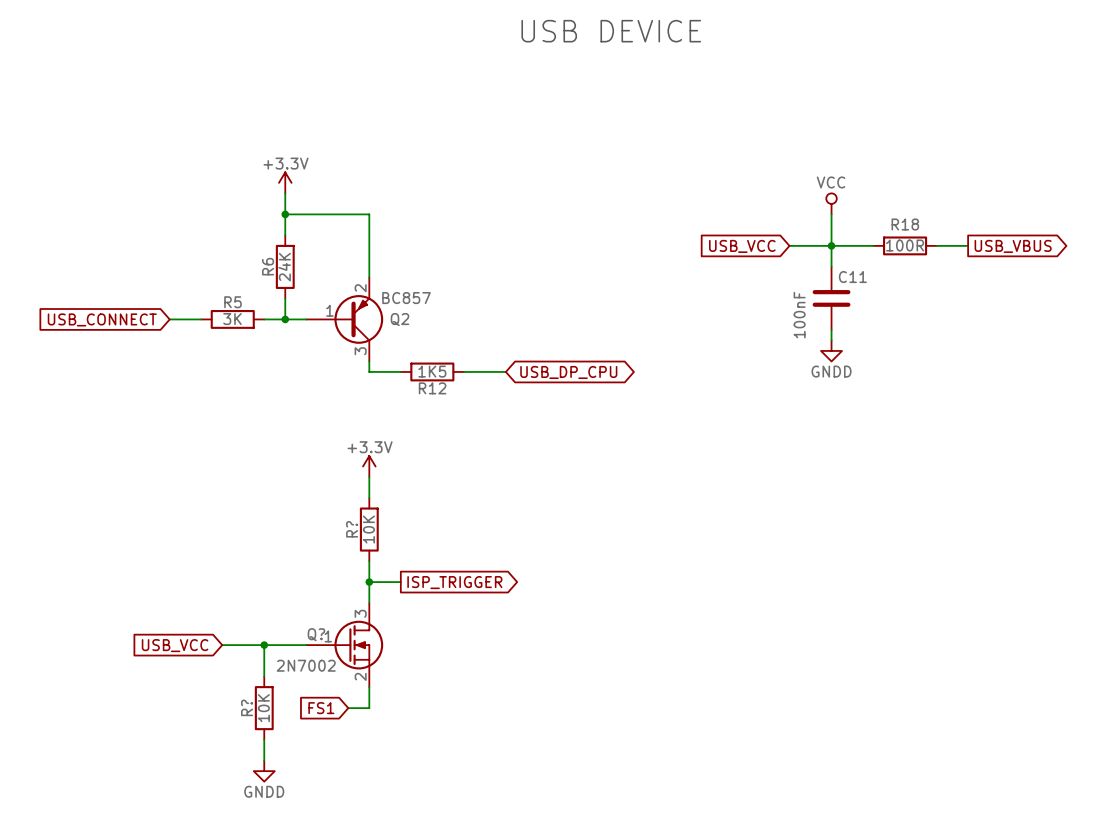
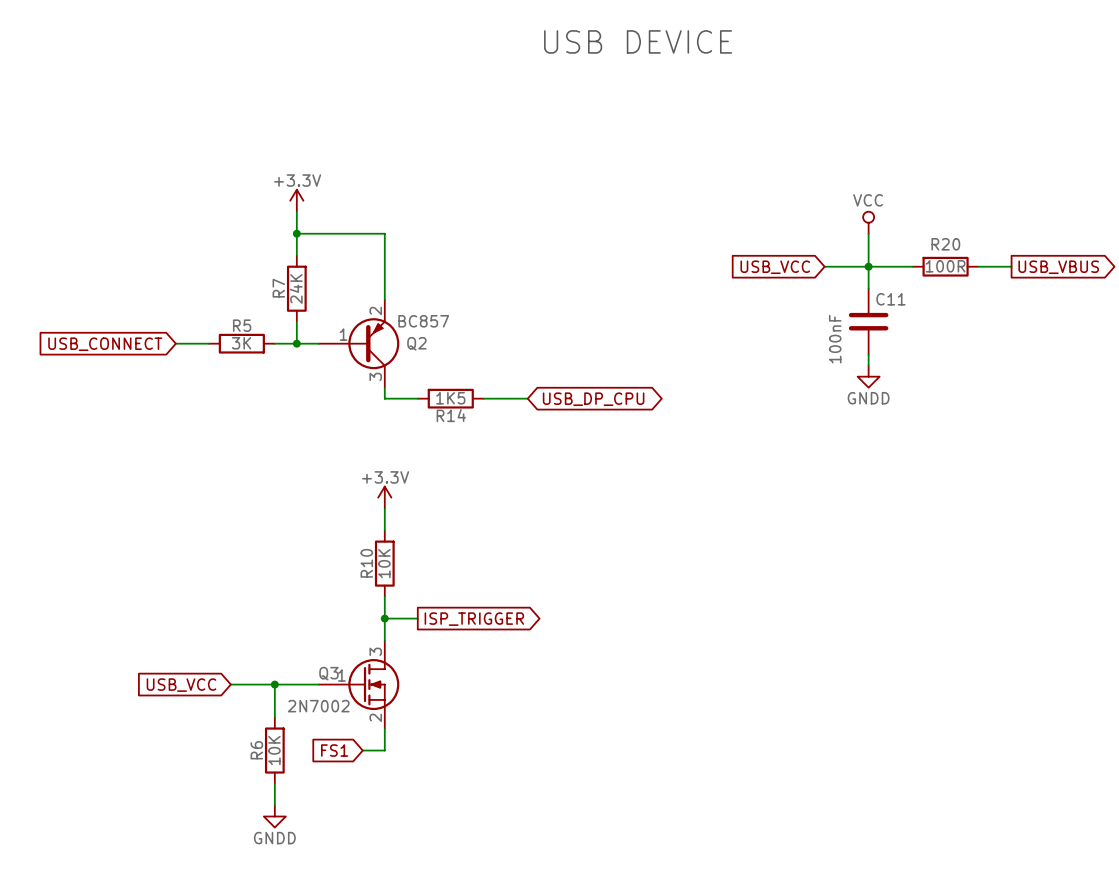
R18 name: R18 (905, 224) -> R20 (945, 244)
R6 name: R6 (268, 266) -> R7 (278, 288)
R12 name: R12 (432, 388) -> R14 (451, 415)
R? name: R? (352, 529) -> R10 (366, 563)
Q? name: Q? (316, 634) -> Q3 (328, 673)
R? name: R? (247, 707) -> R6 (256, 750)

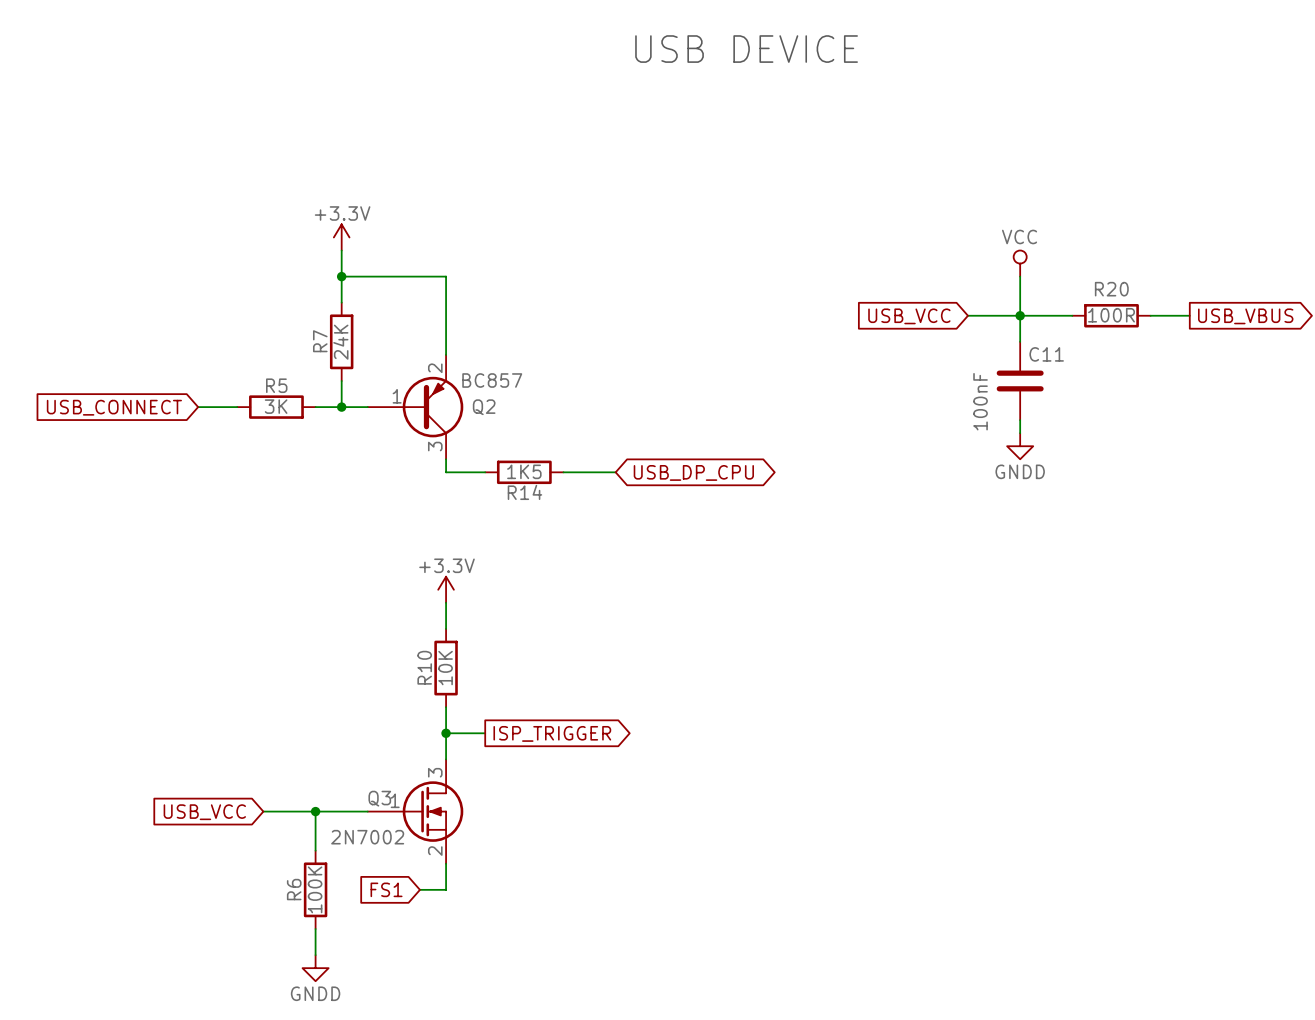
R6 value: 10K (274, 750) -> 100K (315, 889)

